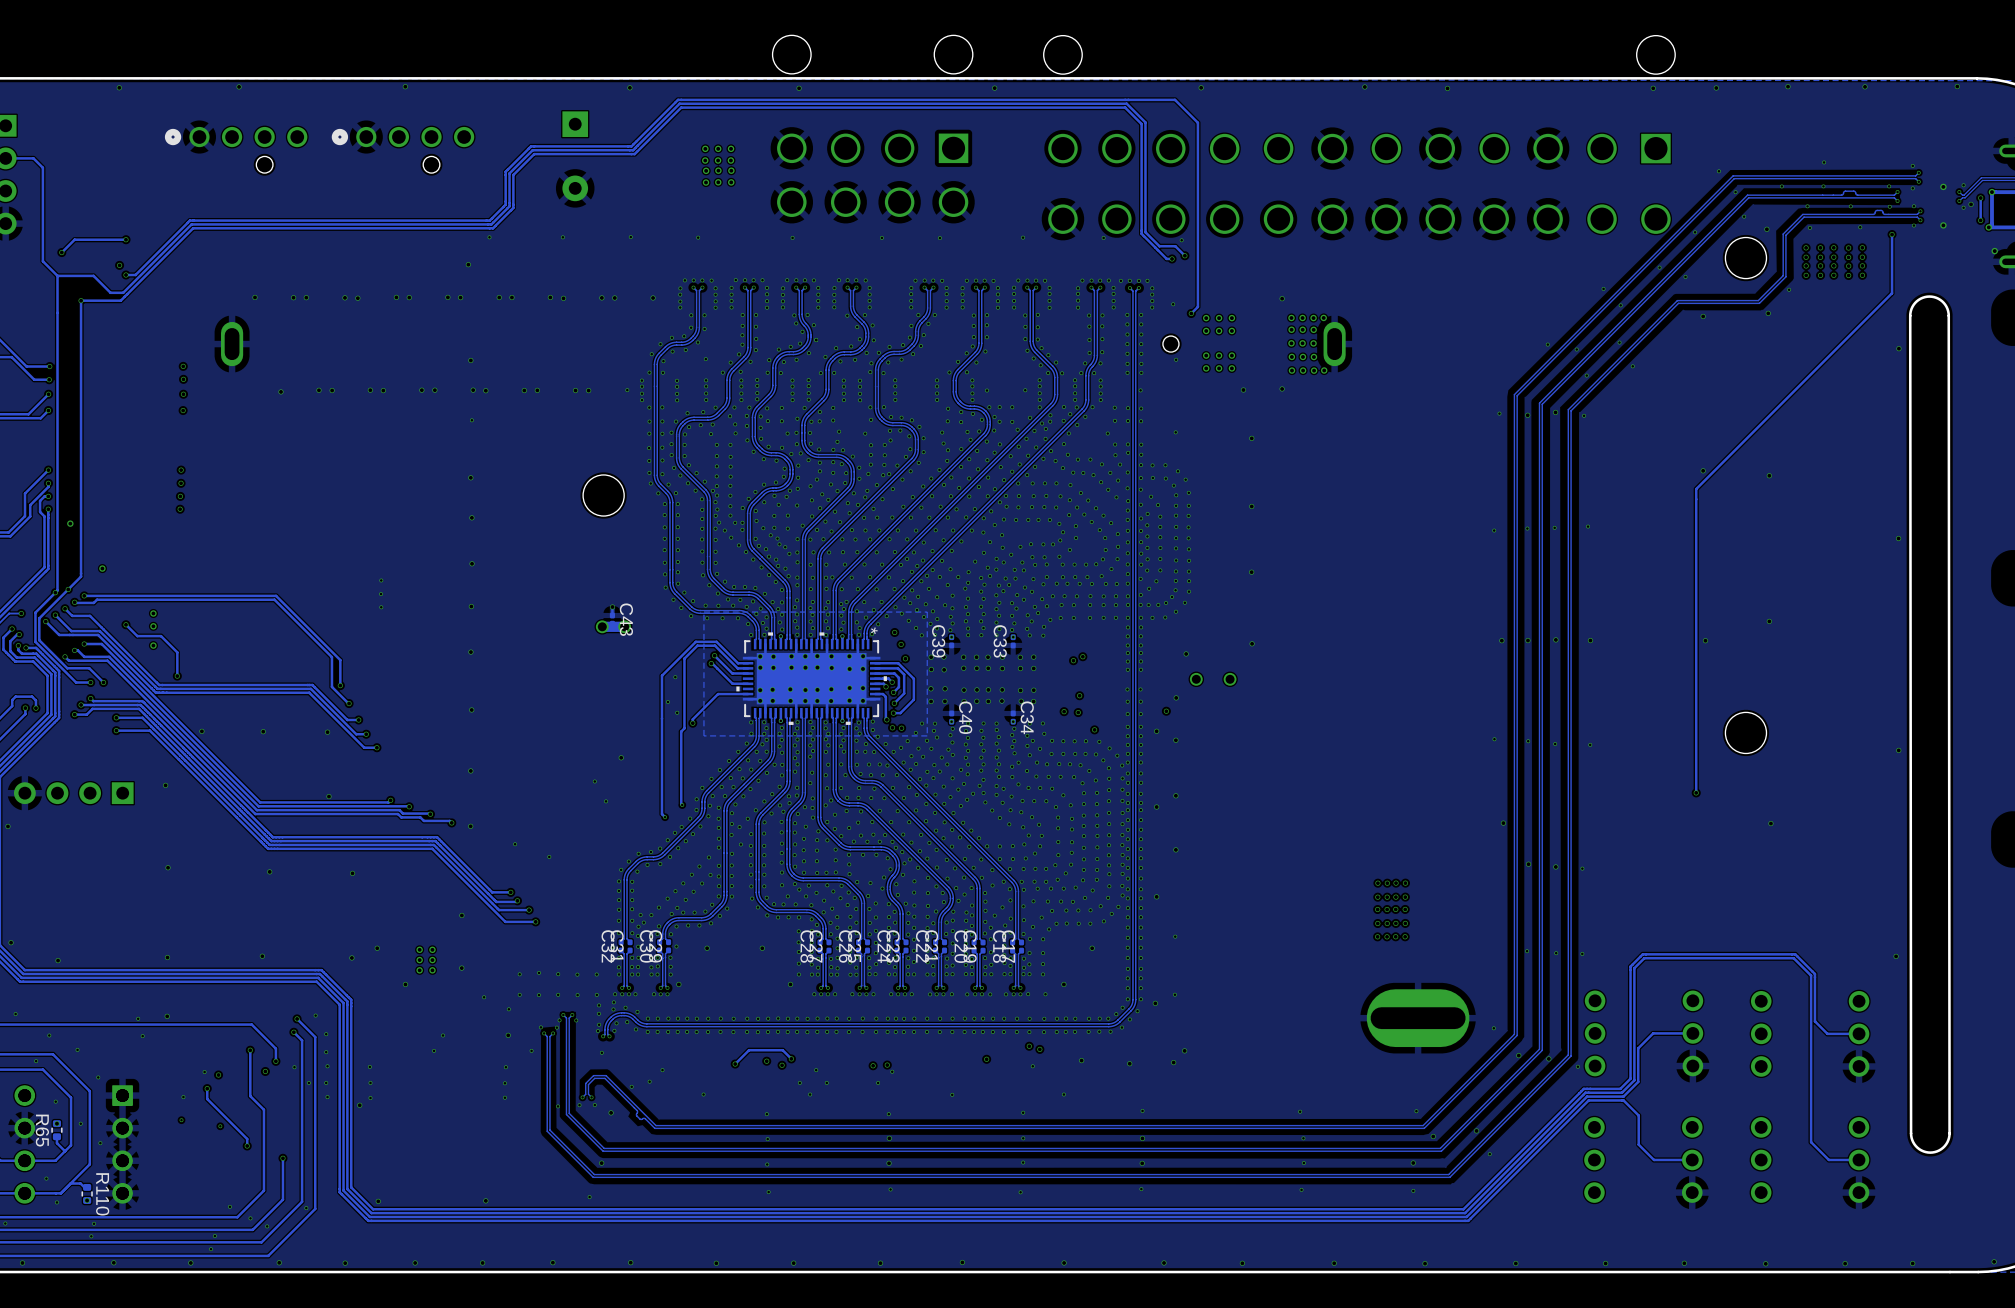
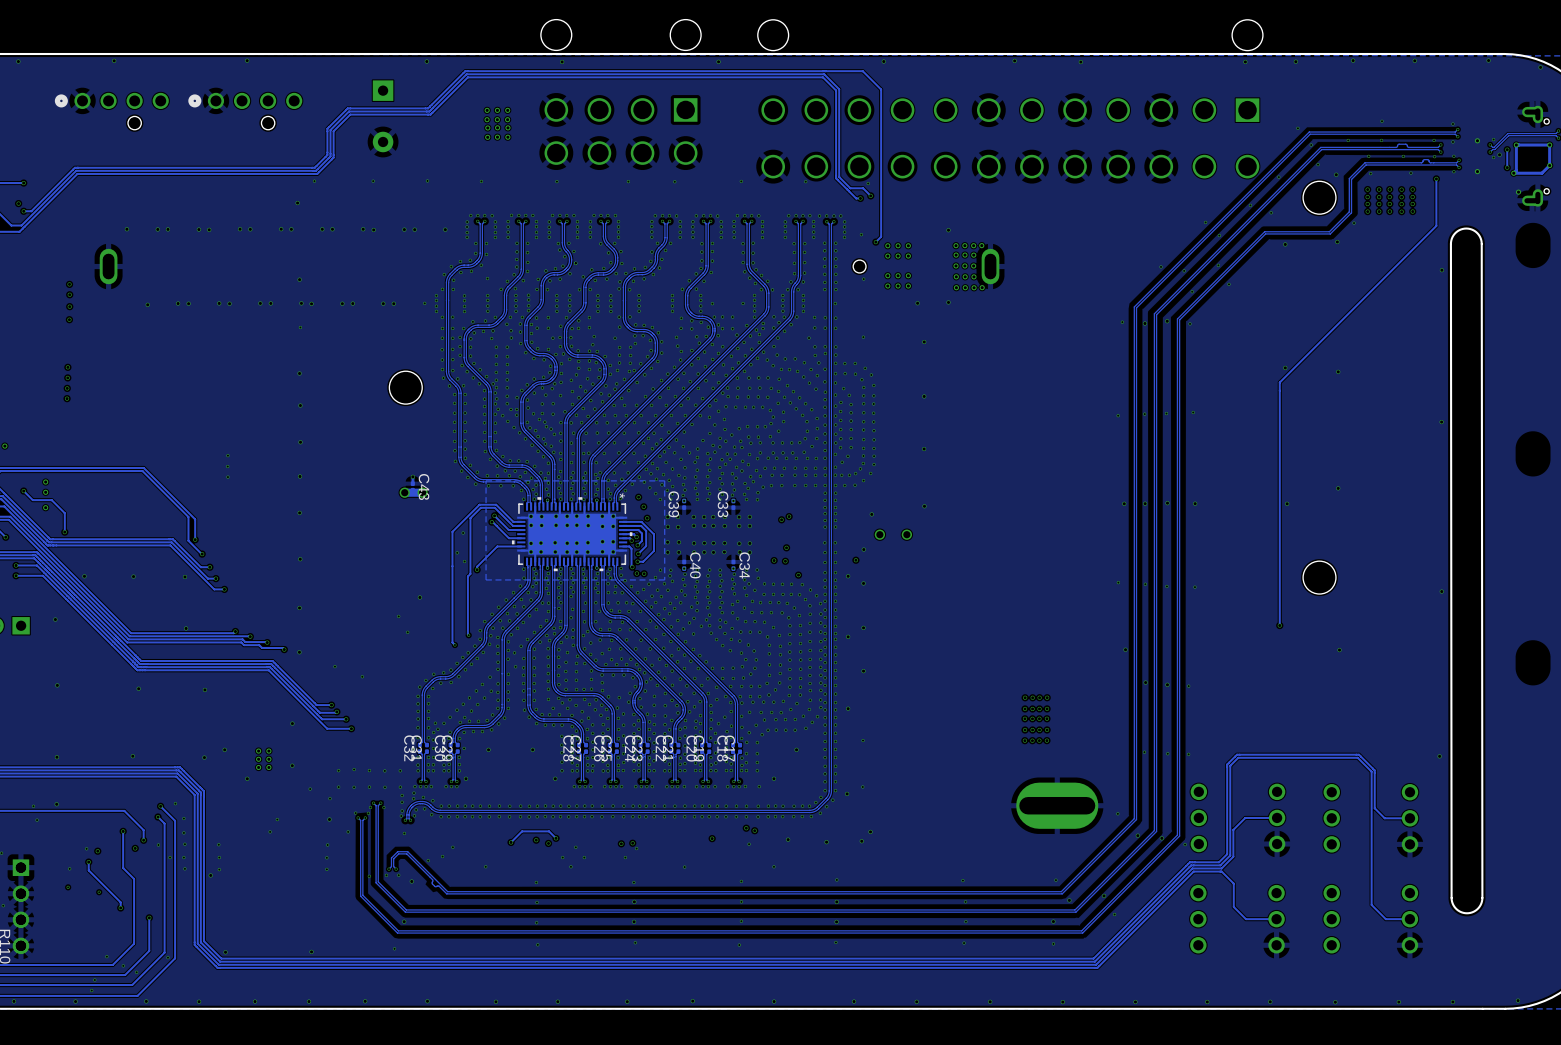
via: (967, 799) -> none
via: none -> (693, 634)
via: (960, 805) -> none

